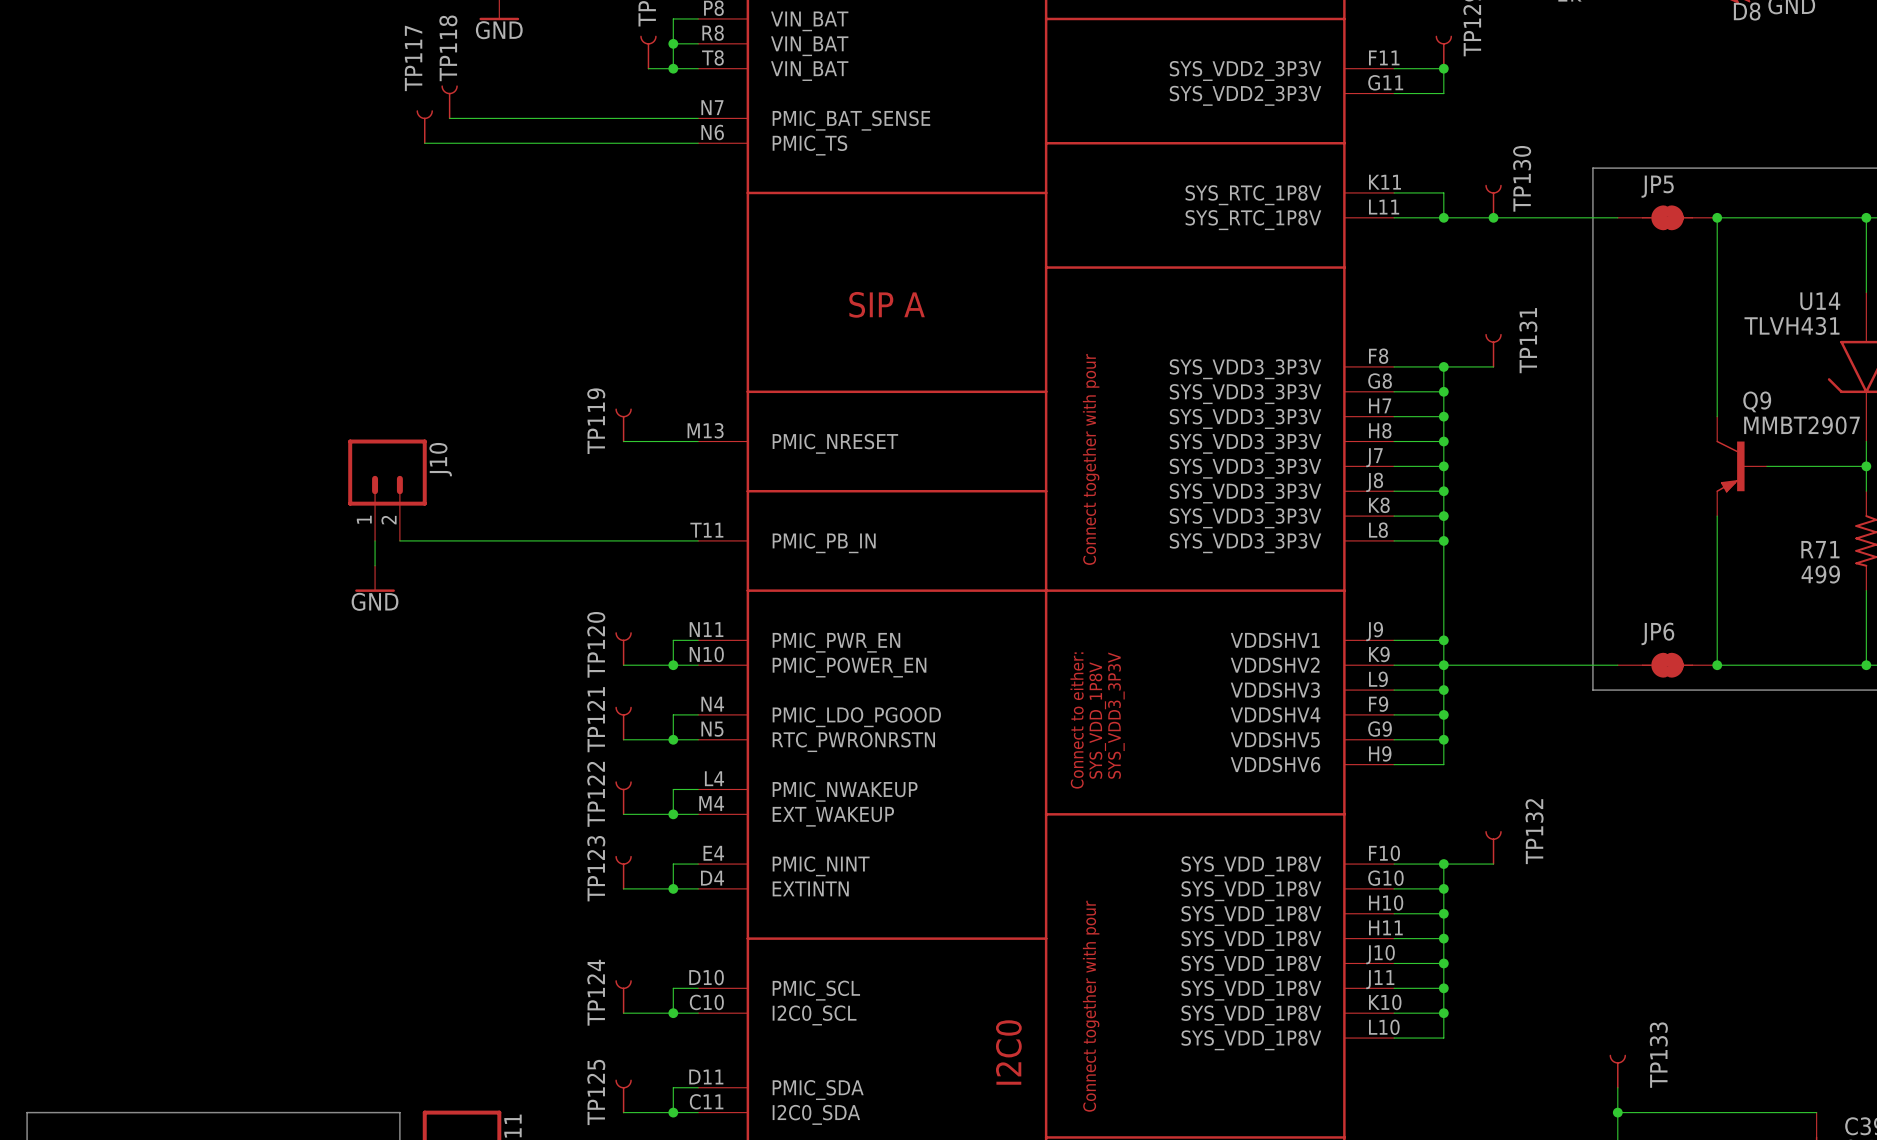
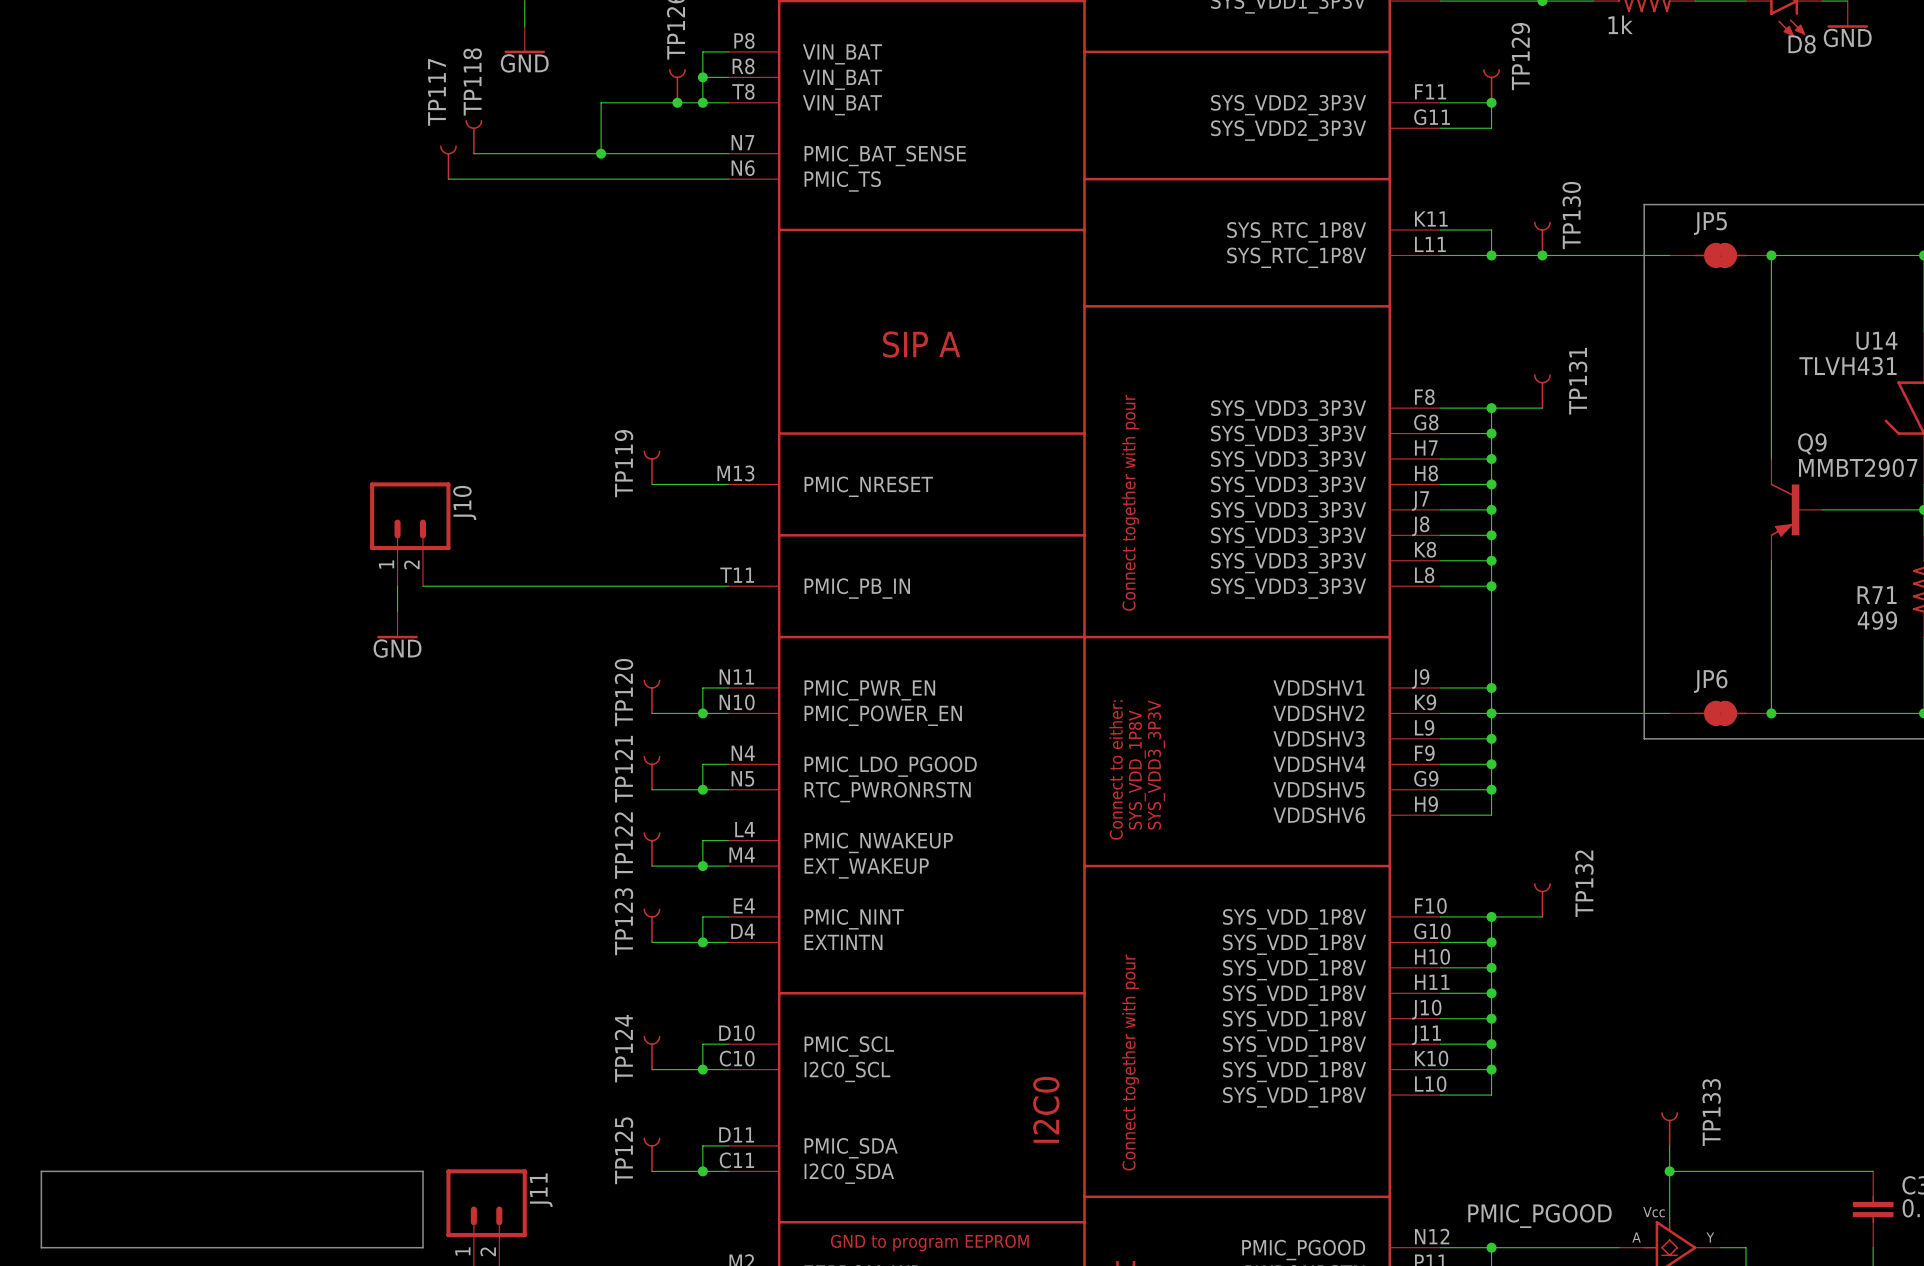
wire: none -> (677, 102) (601, 102) (601, 153)
junction: none -> (677, 102)
junction: none -> (601, 153)

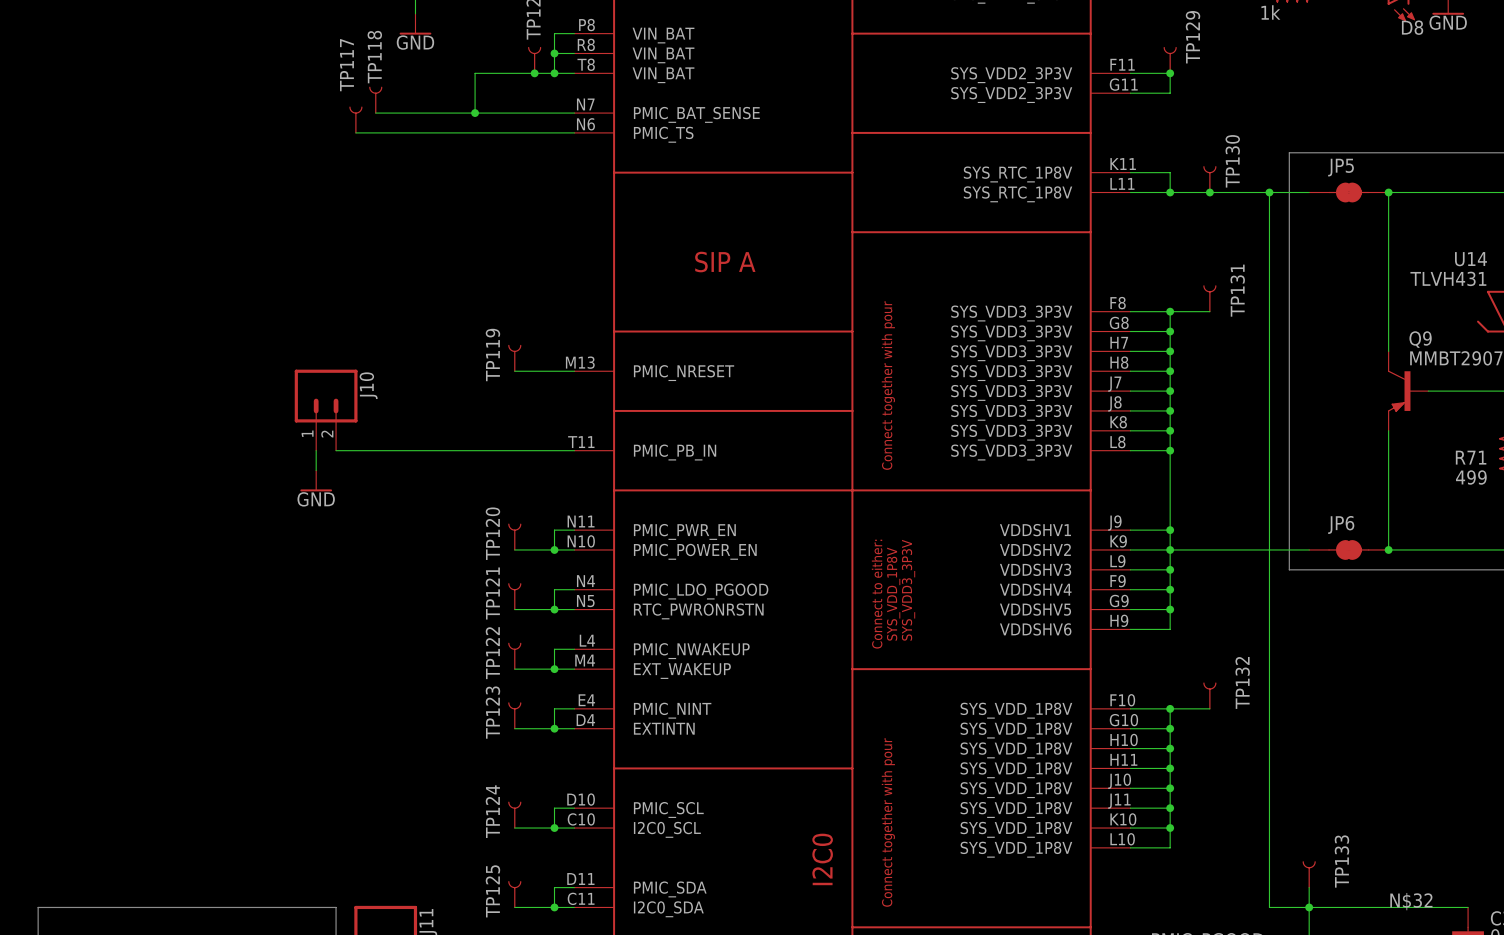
wire: none -> (1269, 192) (1269, 907) (1309, 907)
junction: none -> (1269, 192)
label: none -> N$32 (1411, 901)

